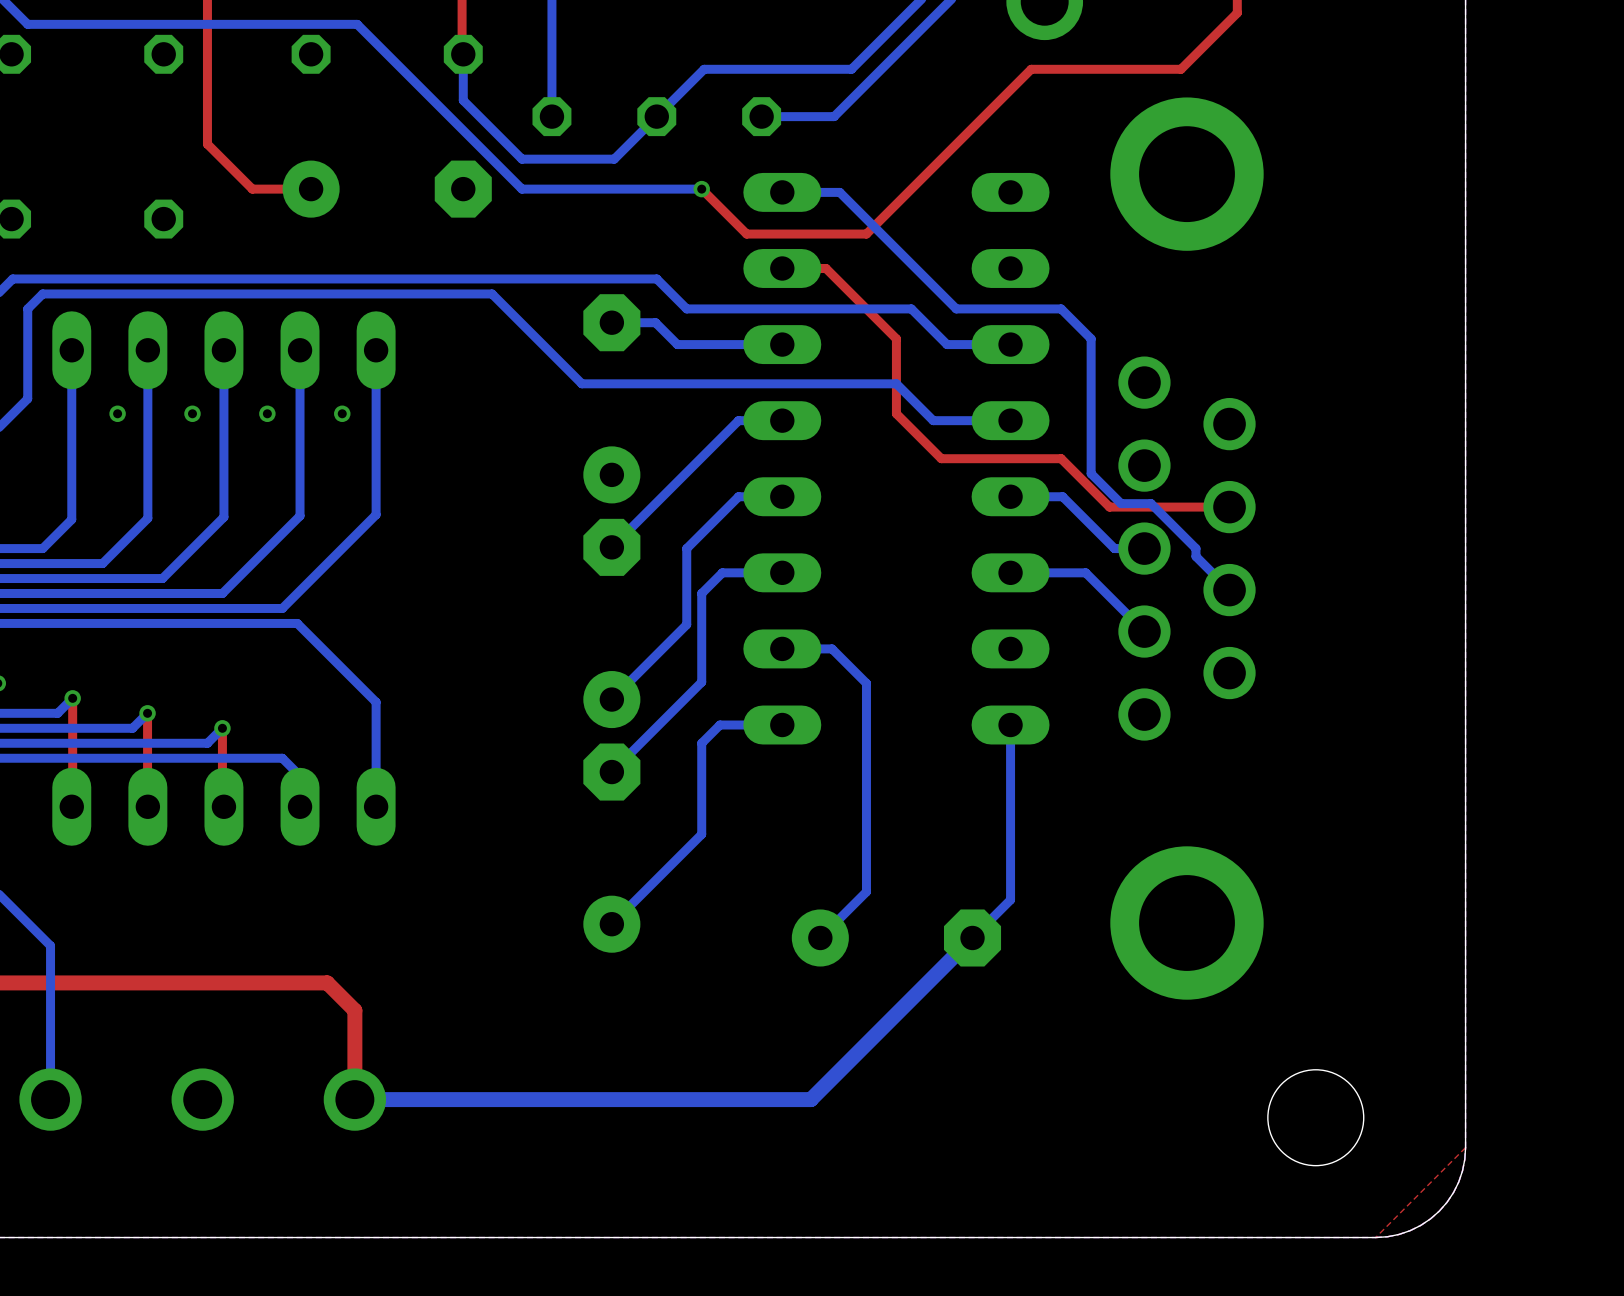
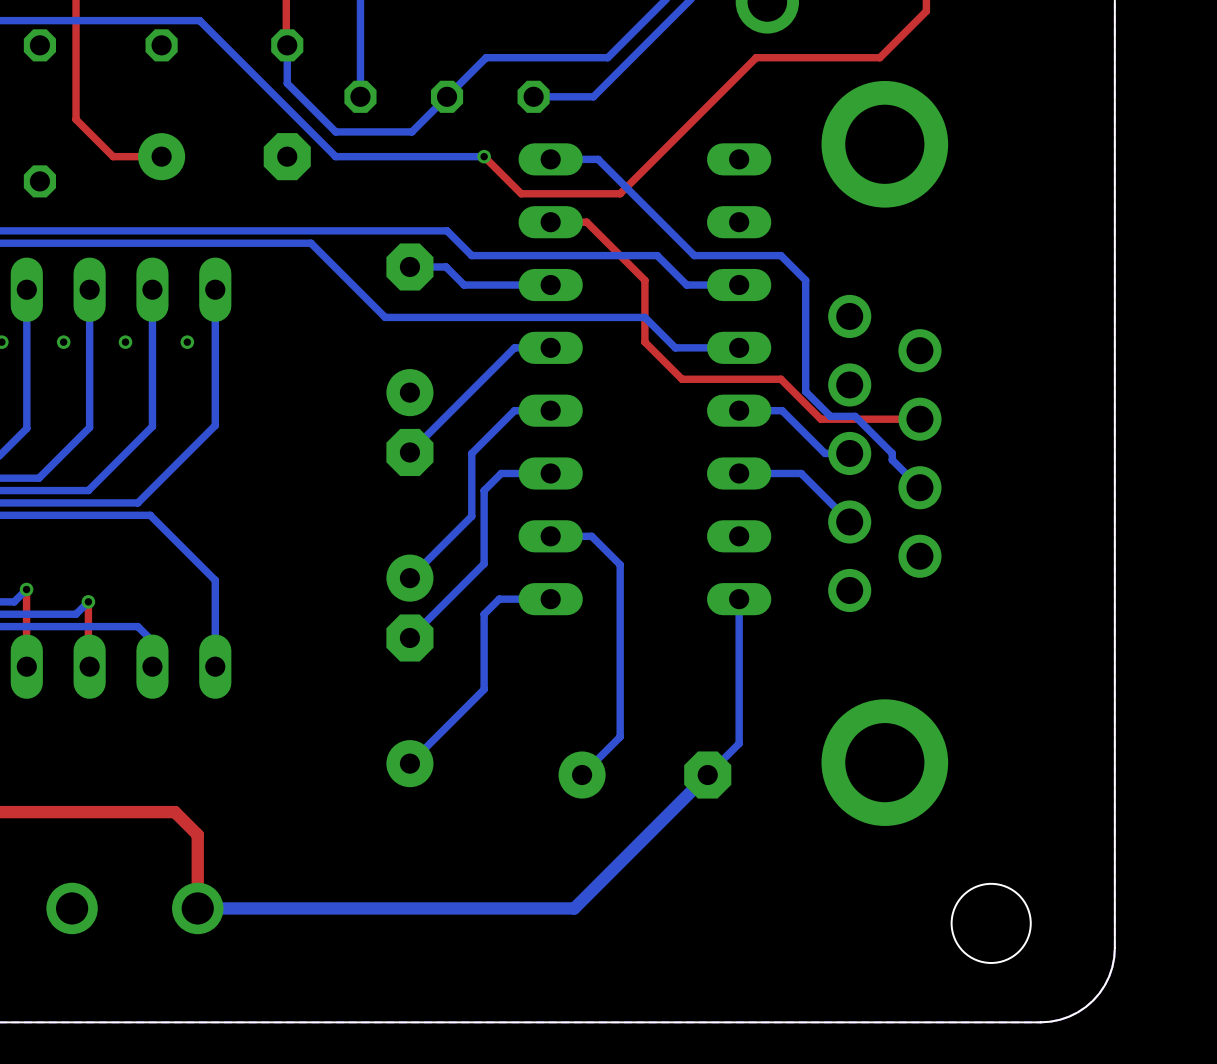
top zone outline: (1465, 1147) (1375, 1237) -> none

